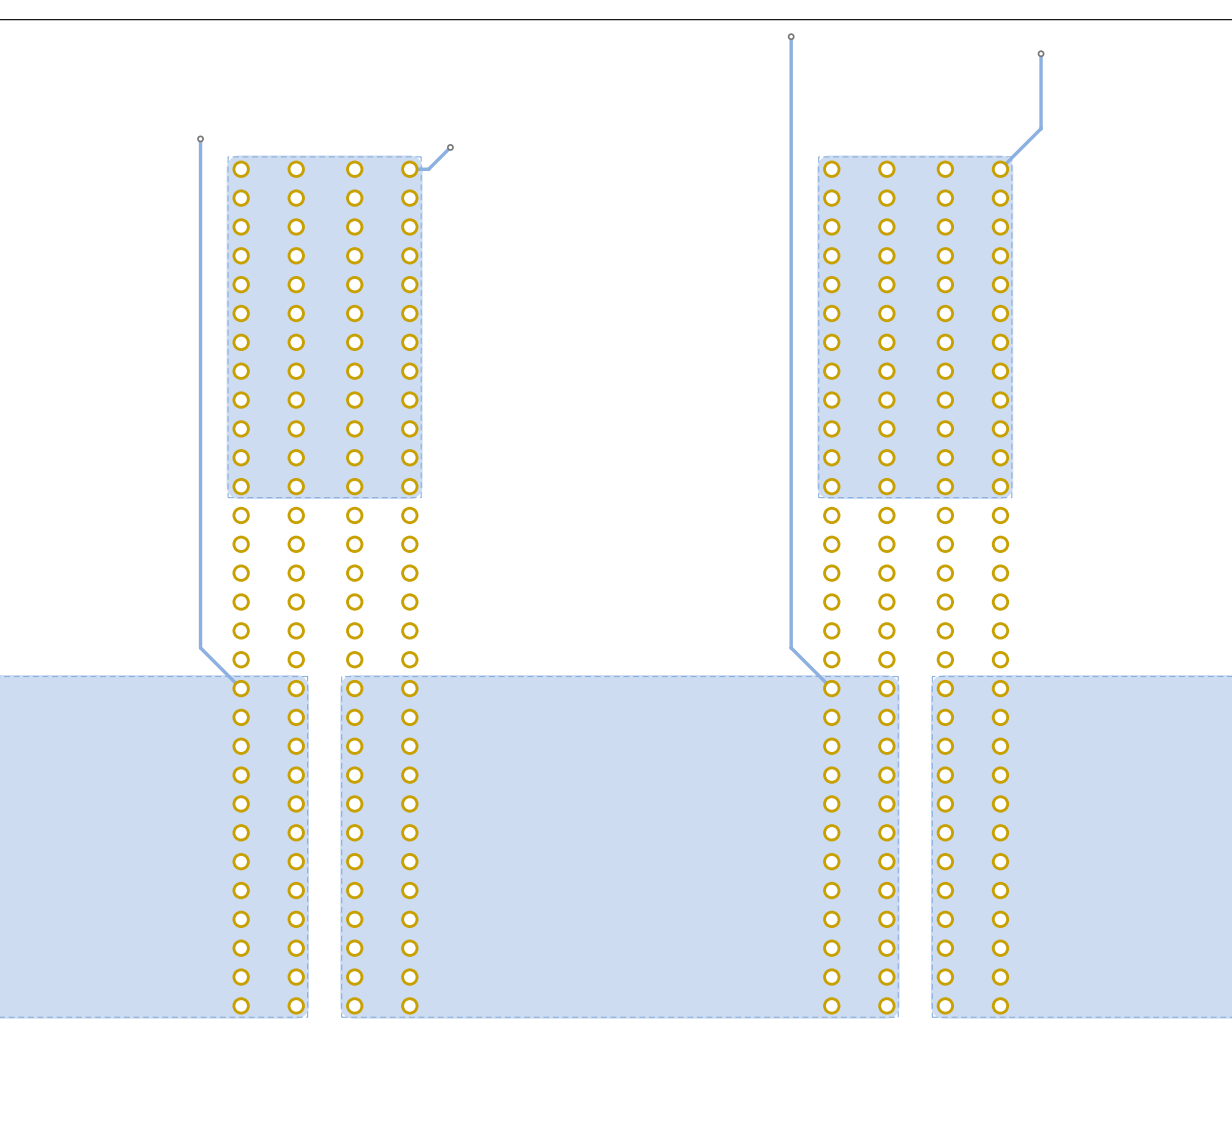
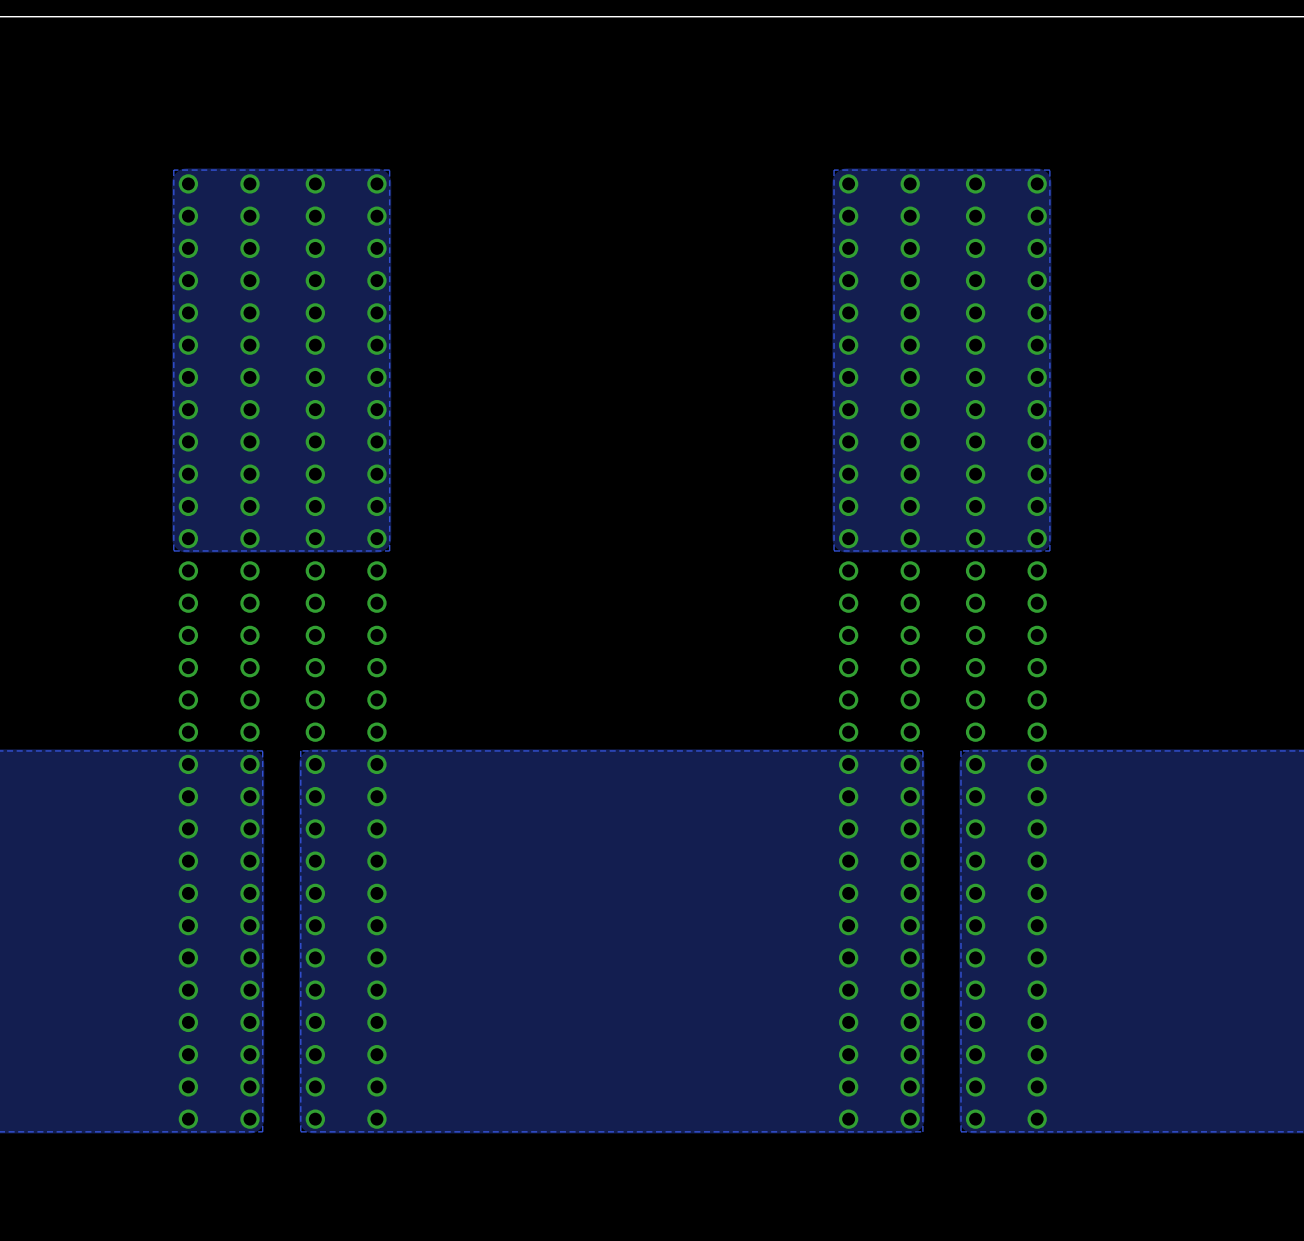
track: (791, 36) (791, 647) (831, 688) -> none
via: (791, 36) -> none
track: (1041, 53) (1041, 128) (1000, 169) -> none
via: (1041, 53) -> none
track: (200, 138) (200, 647) (241, 688) -> none
via: (200, 138) -> none
track: (450, 147) (428, 169) (409, 169) -> none
via: (450, 147) -> none

